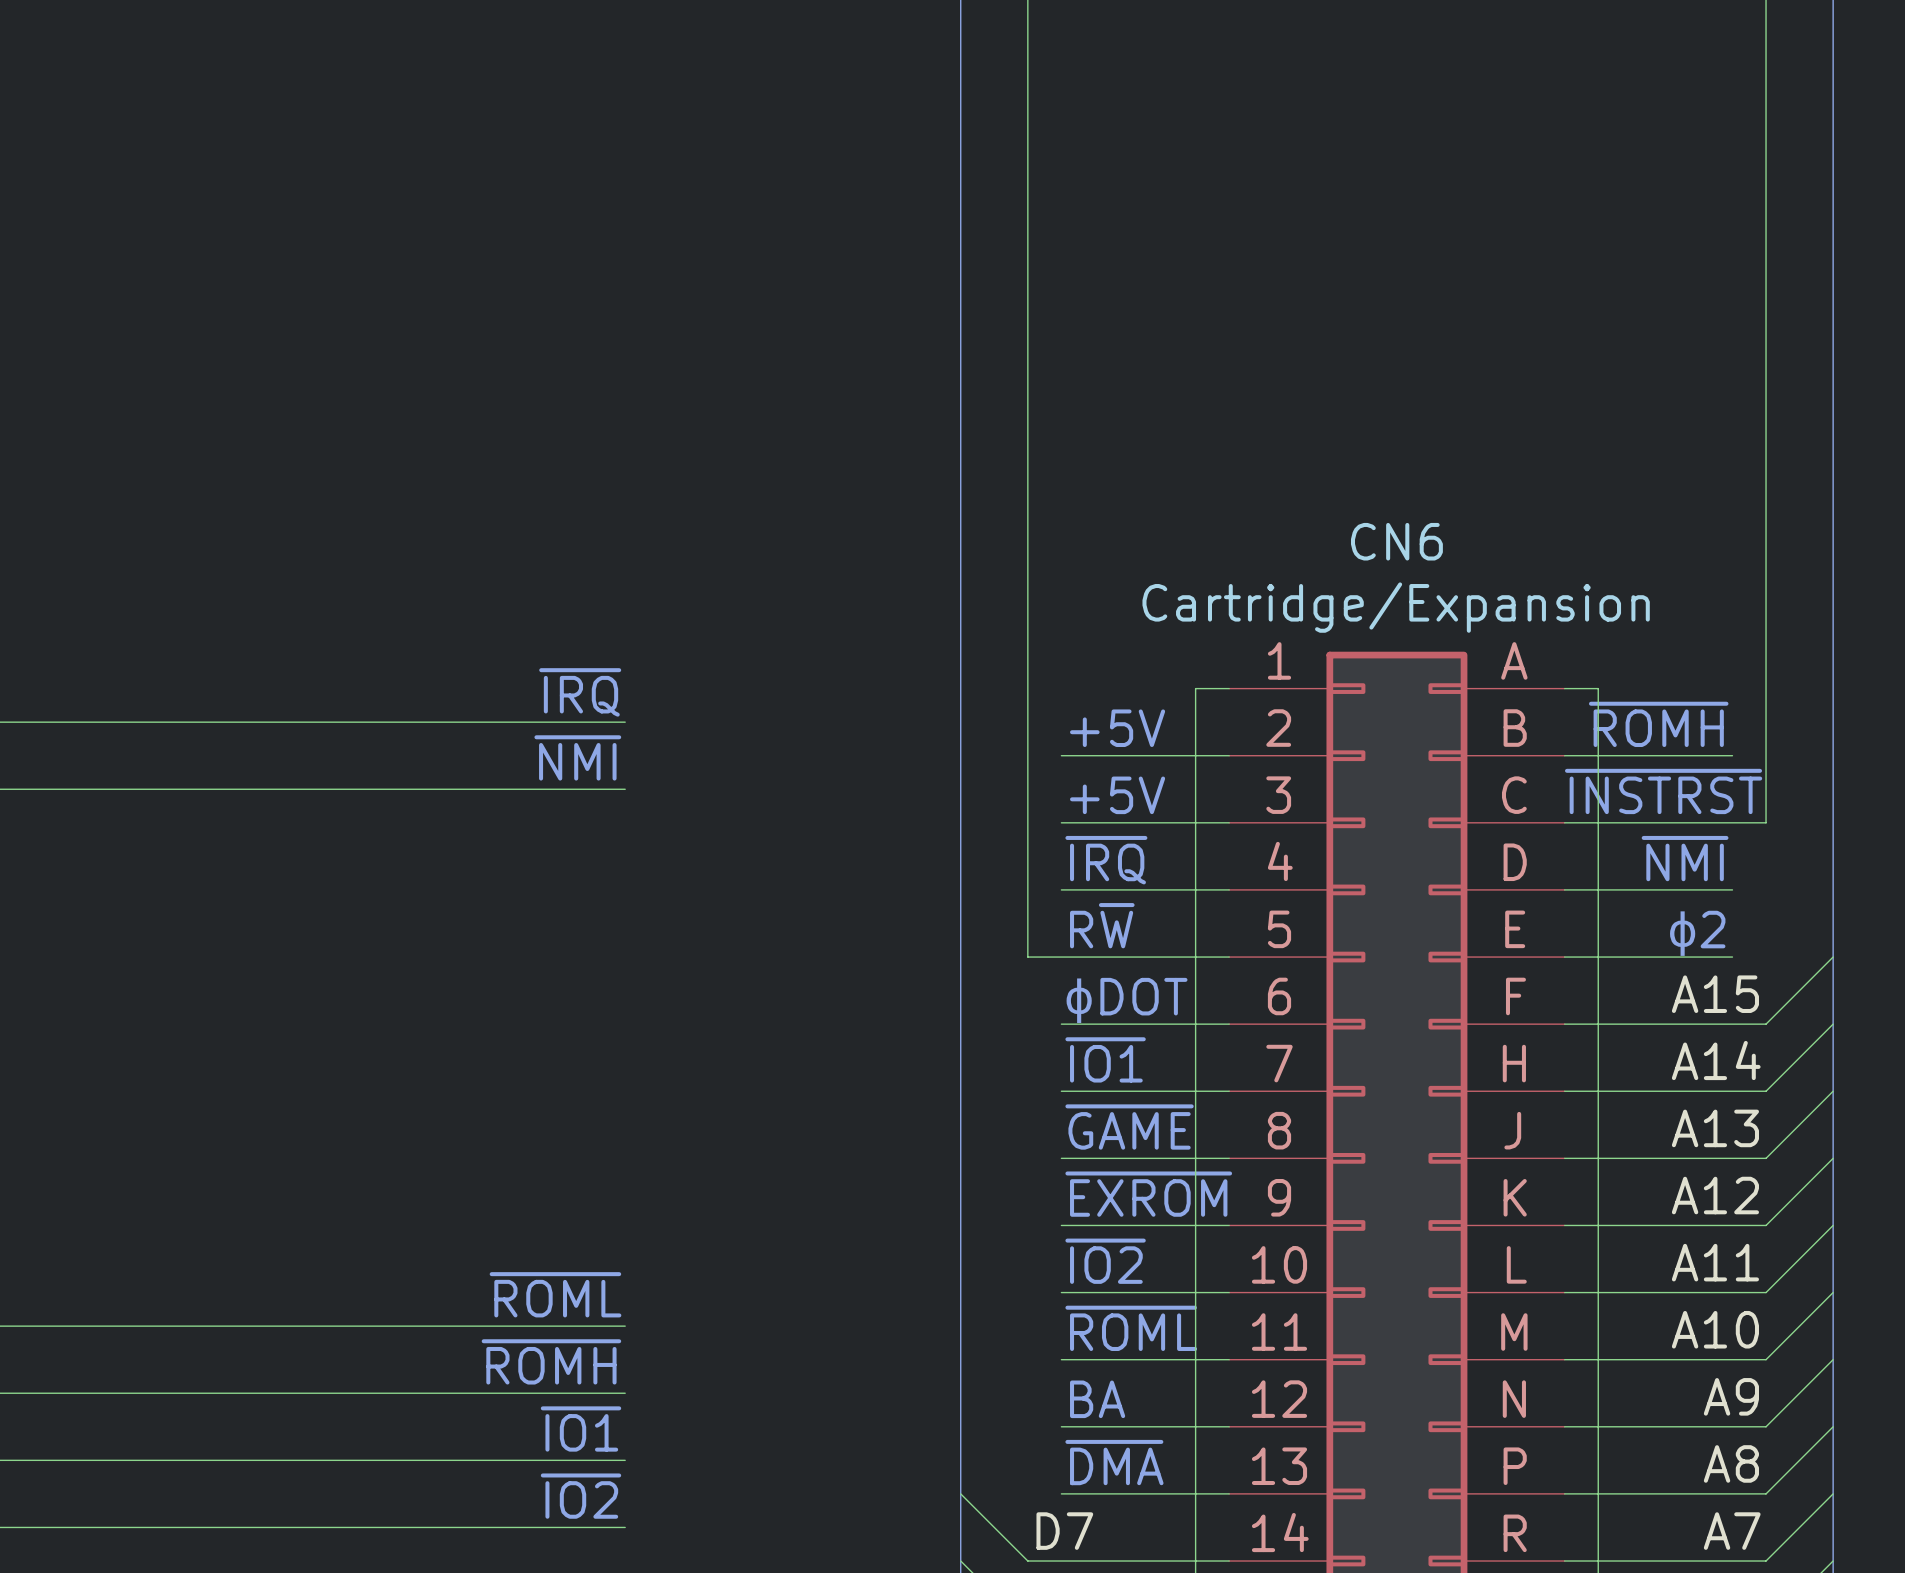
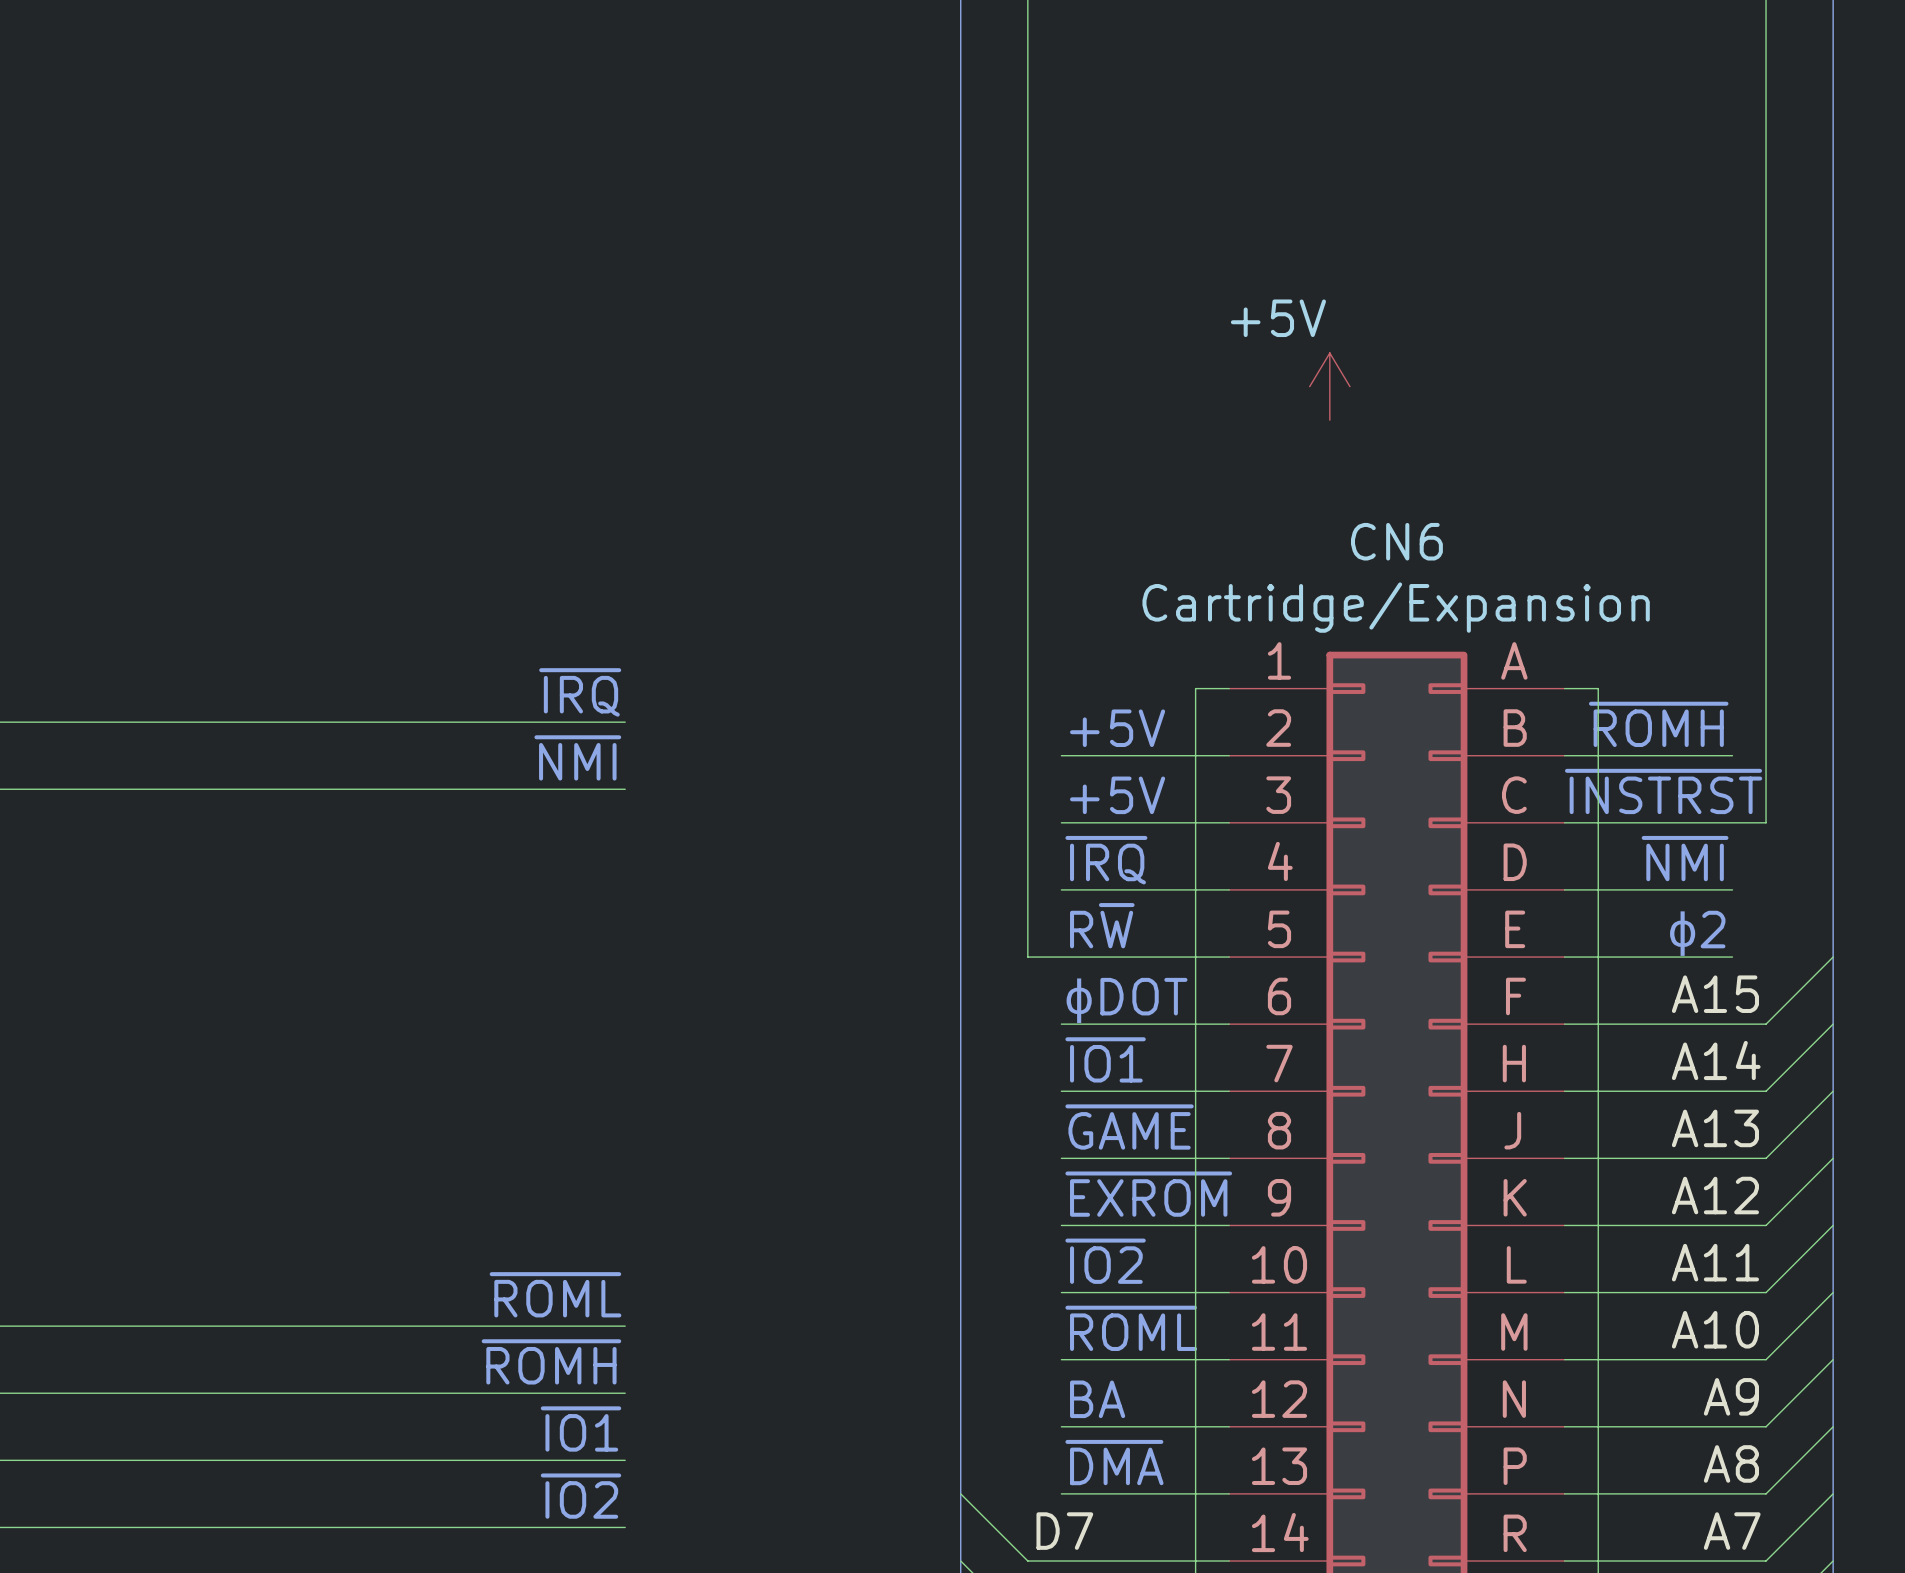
power symbol: none -> +5V (1329, 386)

